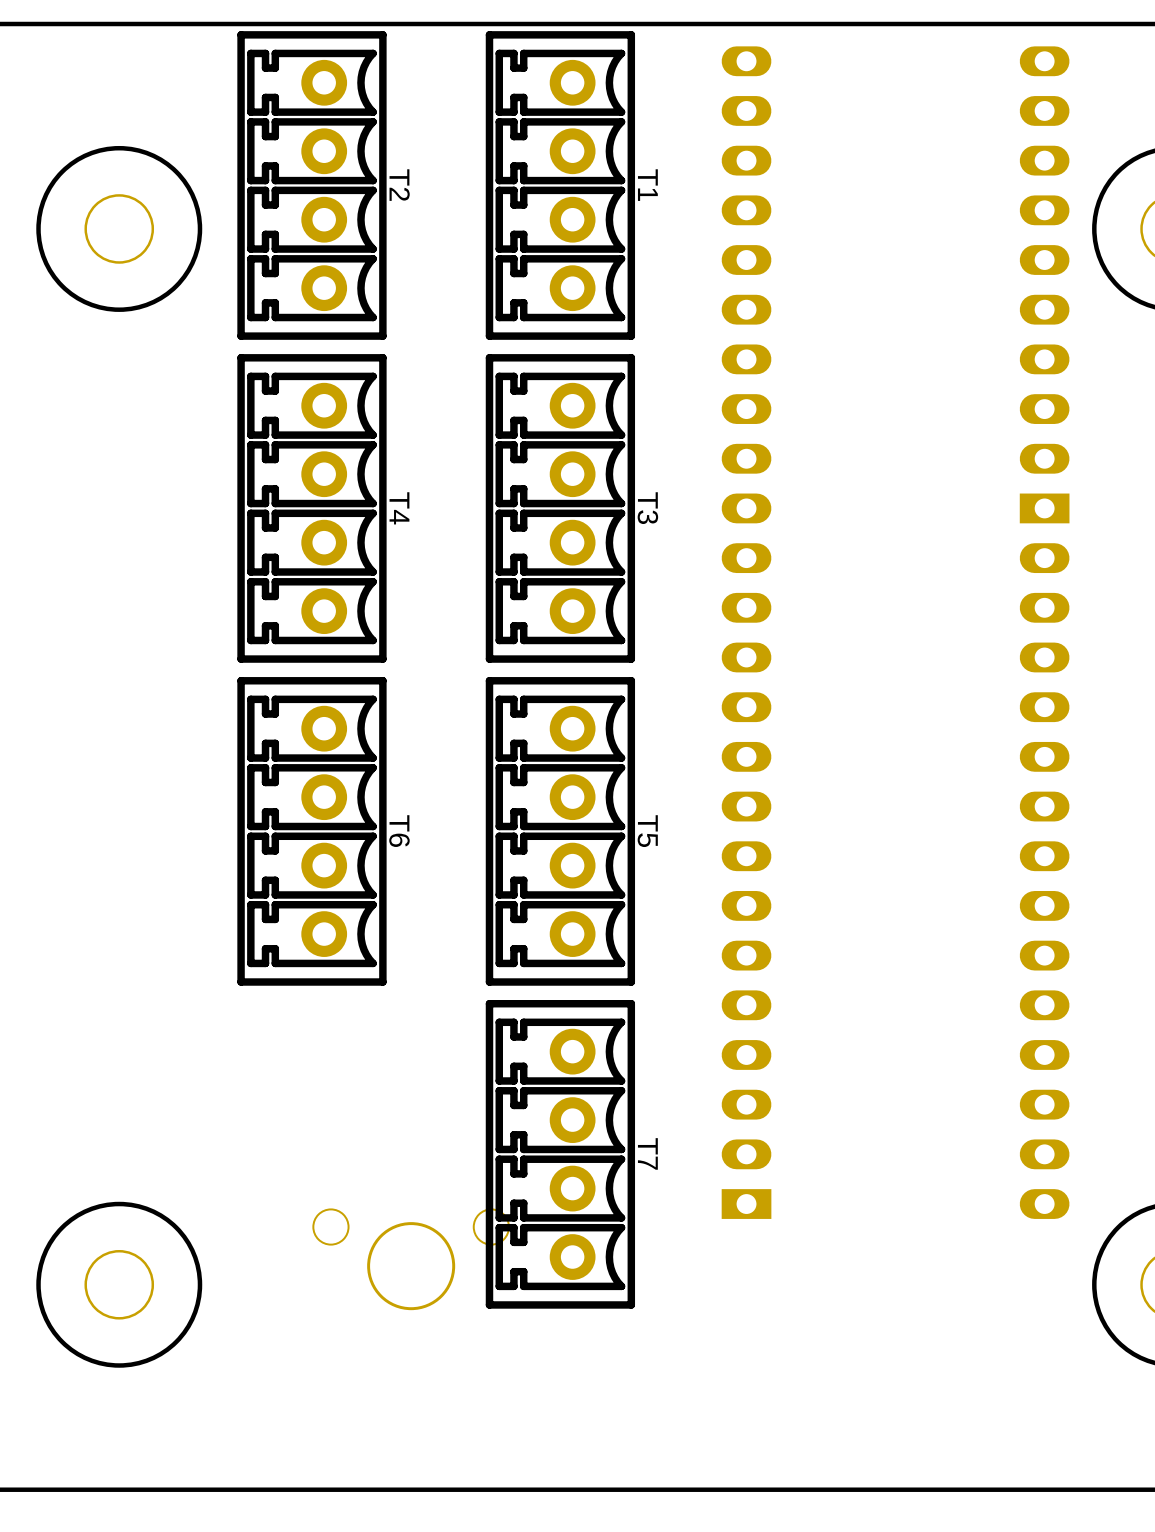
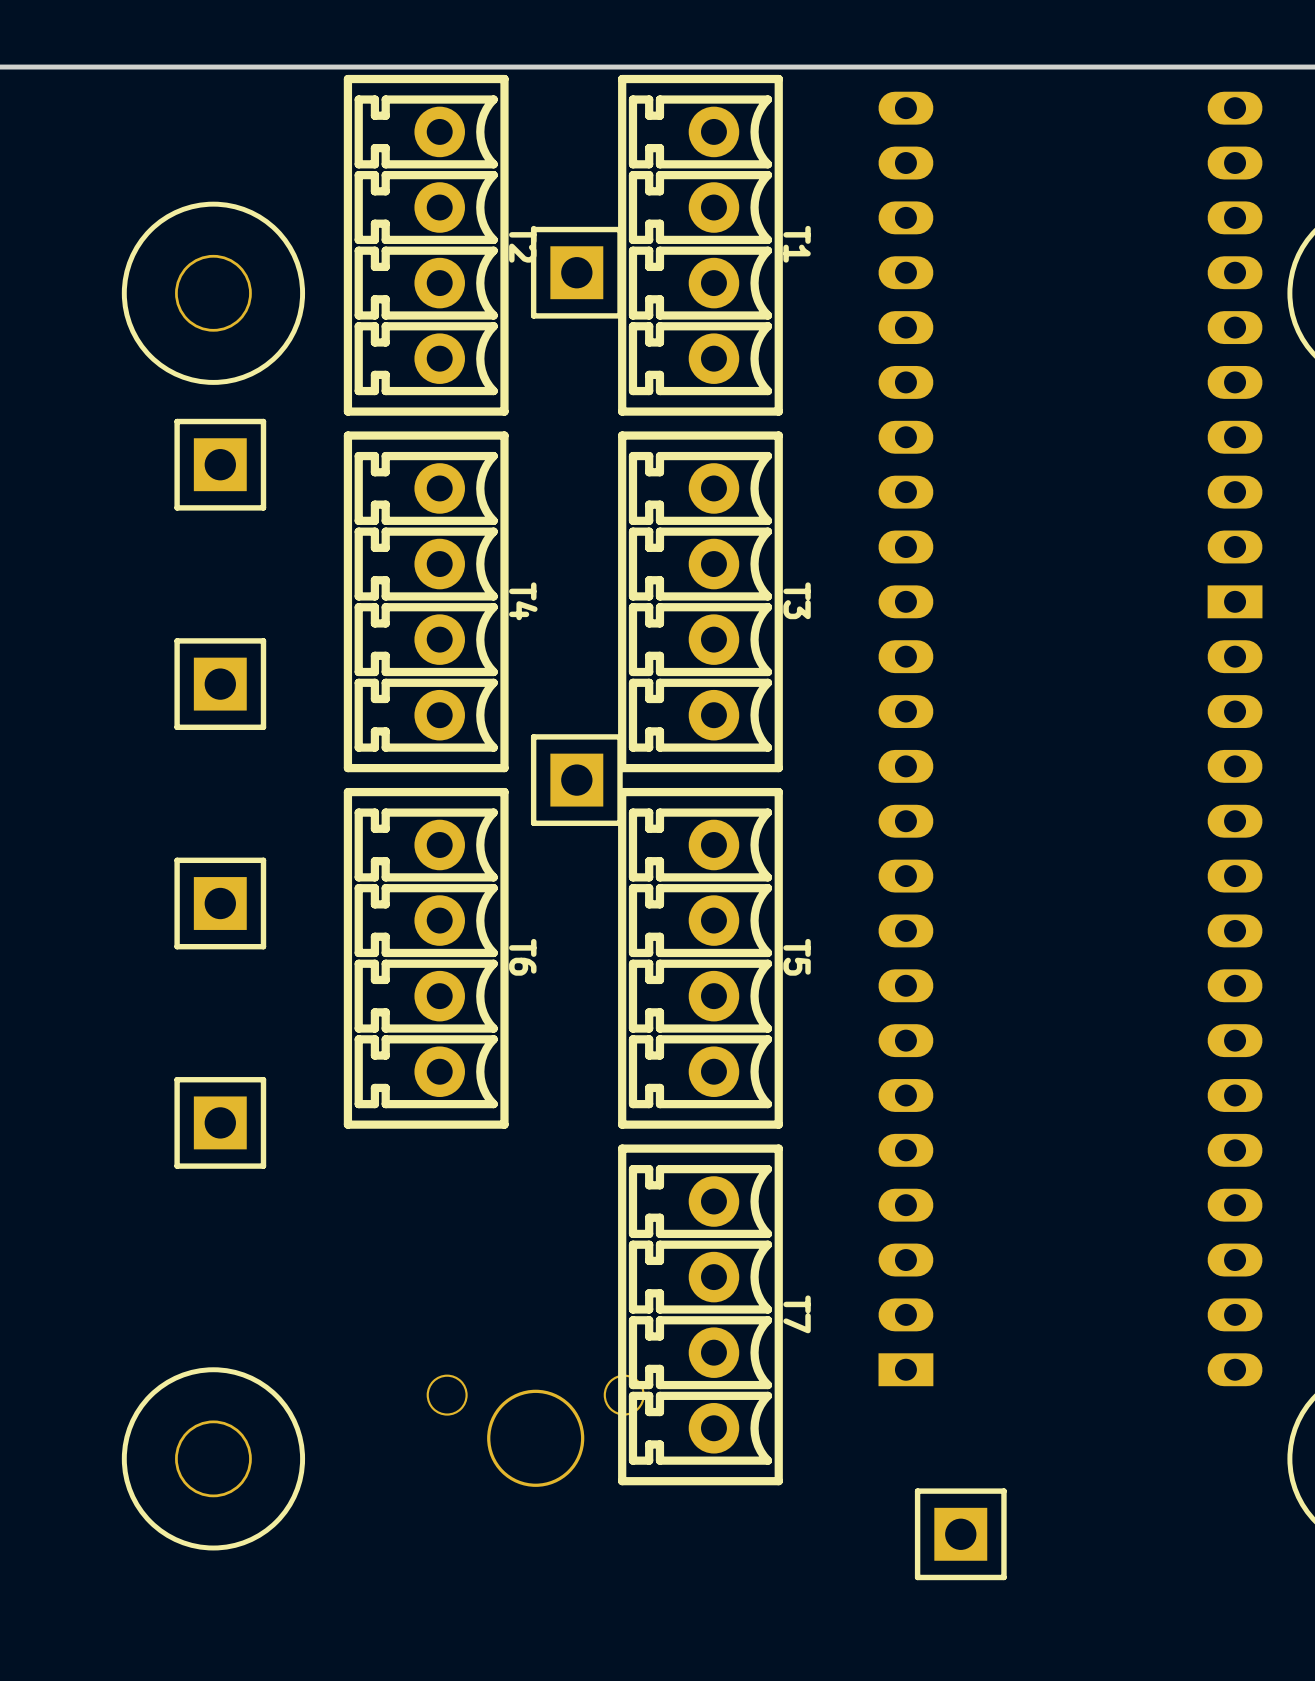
part: none -> (576, 272)
part: none -> (220, 464)
part: none -> (220, 684)
part: none -> (576, 780)
part: none -> (220, 903)
part: none -> (220, 1122)
part: none -> (960, 1534)

